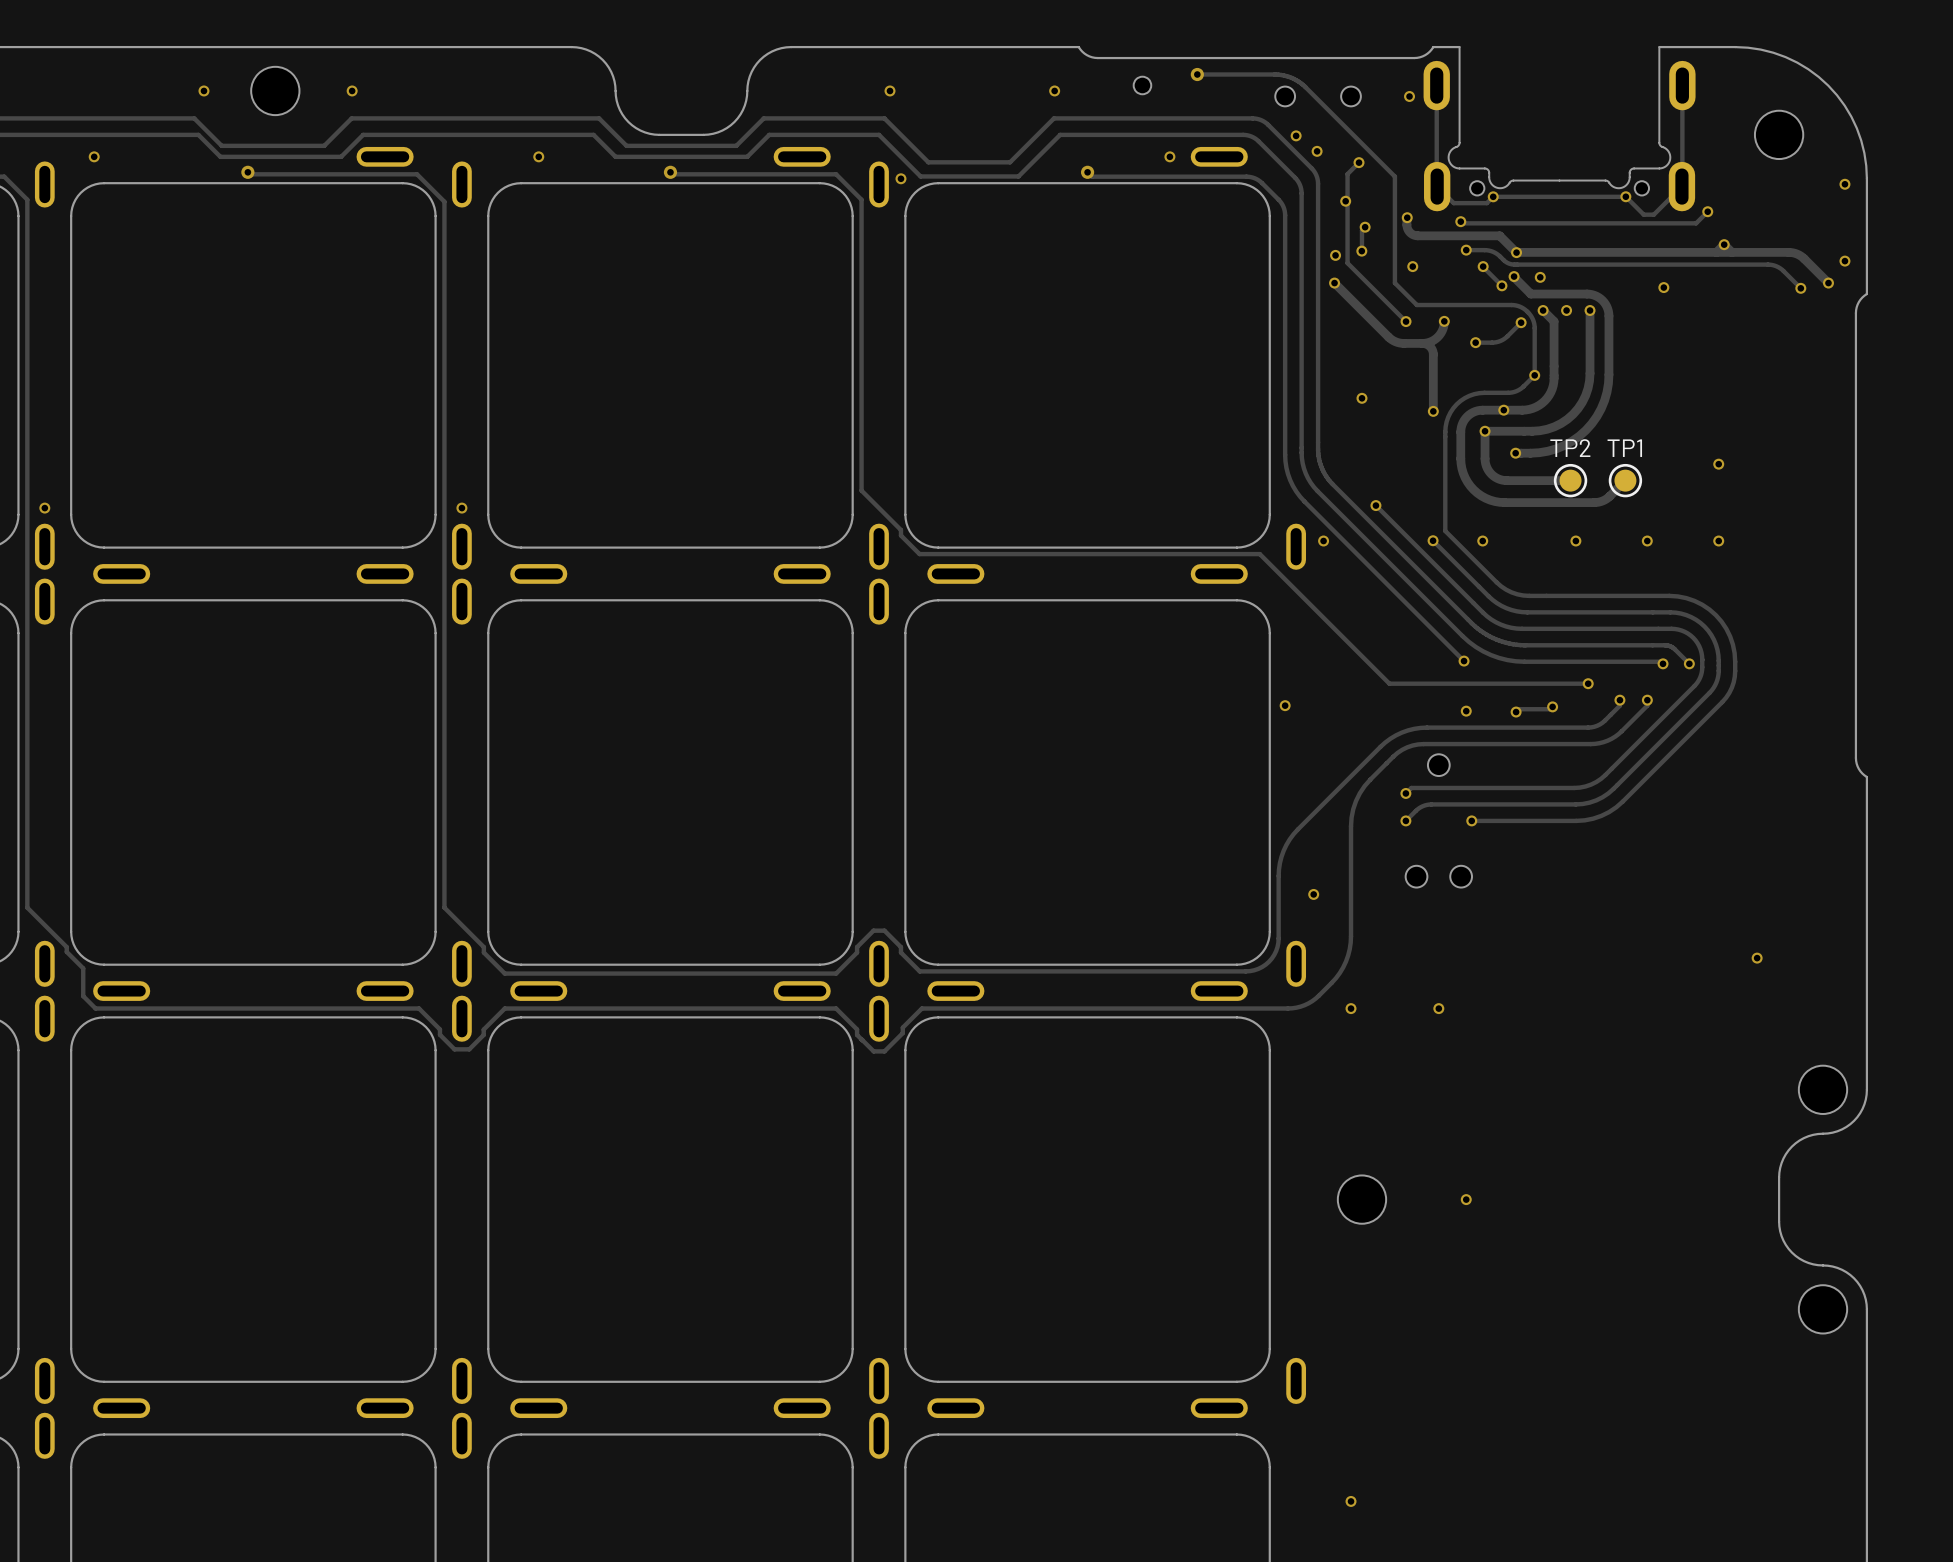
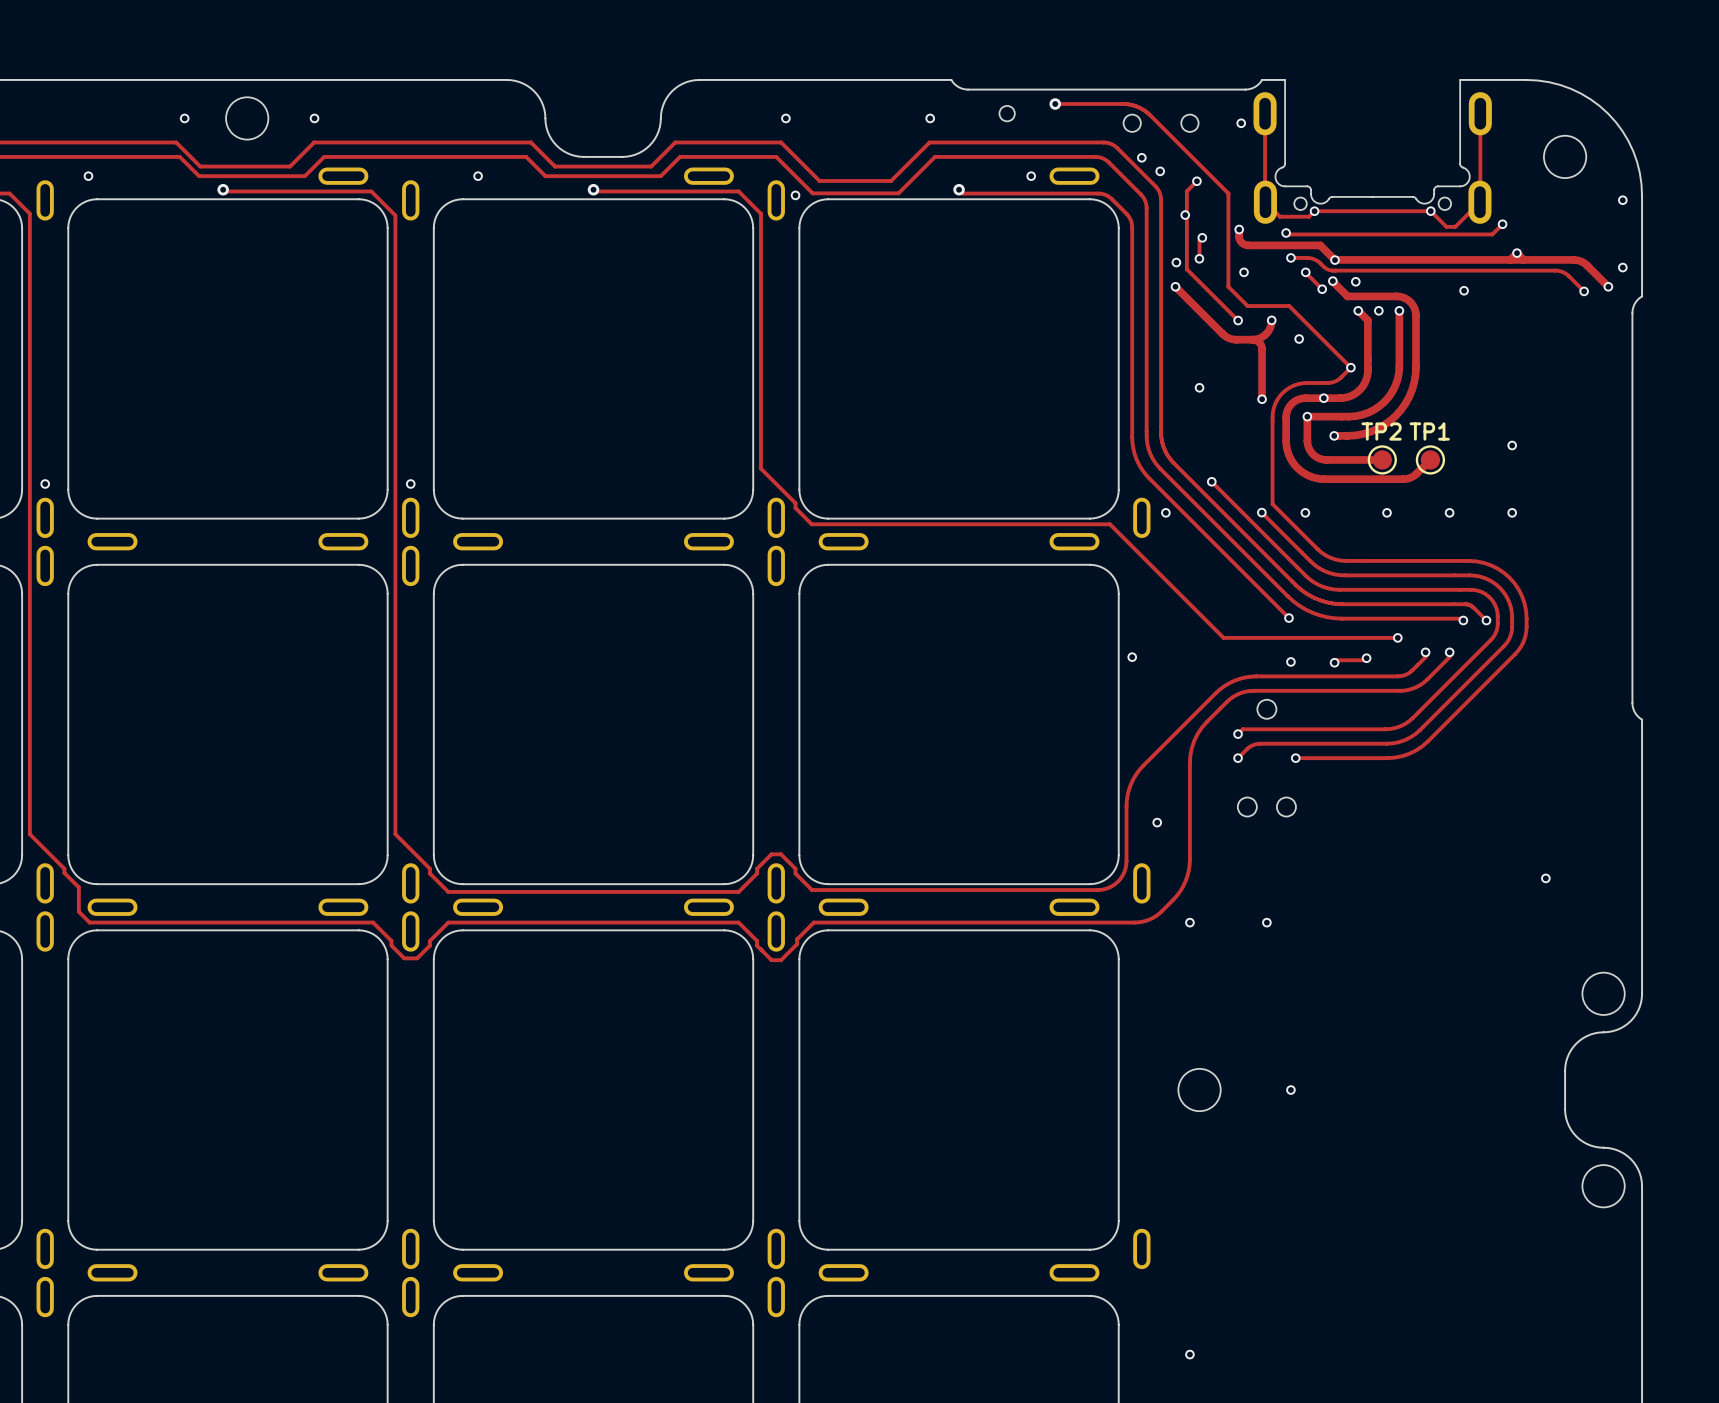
track: (1464, 305) (1513, 305) (1521, 307) (1528, 312) (1534, 325) (1534, 375) -> (1289, 306) (1350, 367)
track: (1521, 322) (1500, 340) (1475, 342) -> none
via: (1521, 322) -> none

